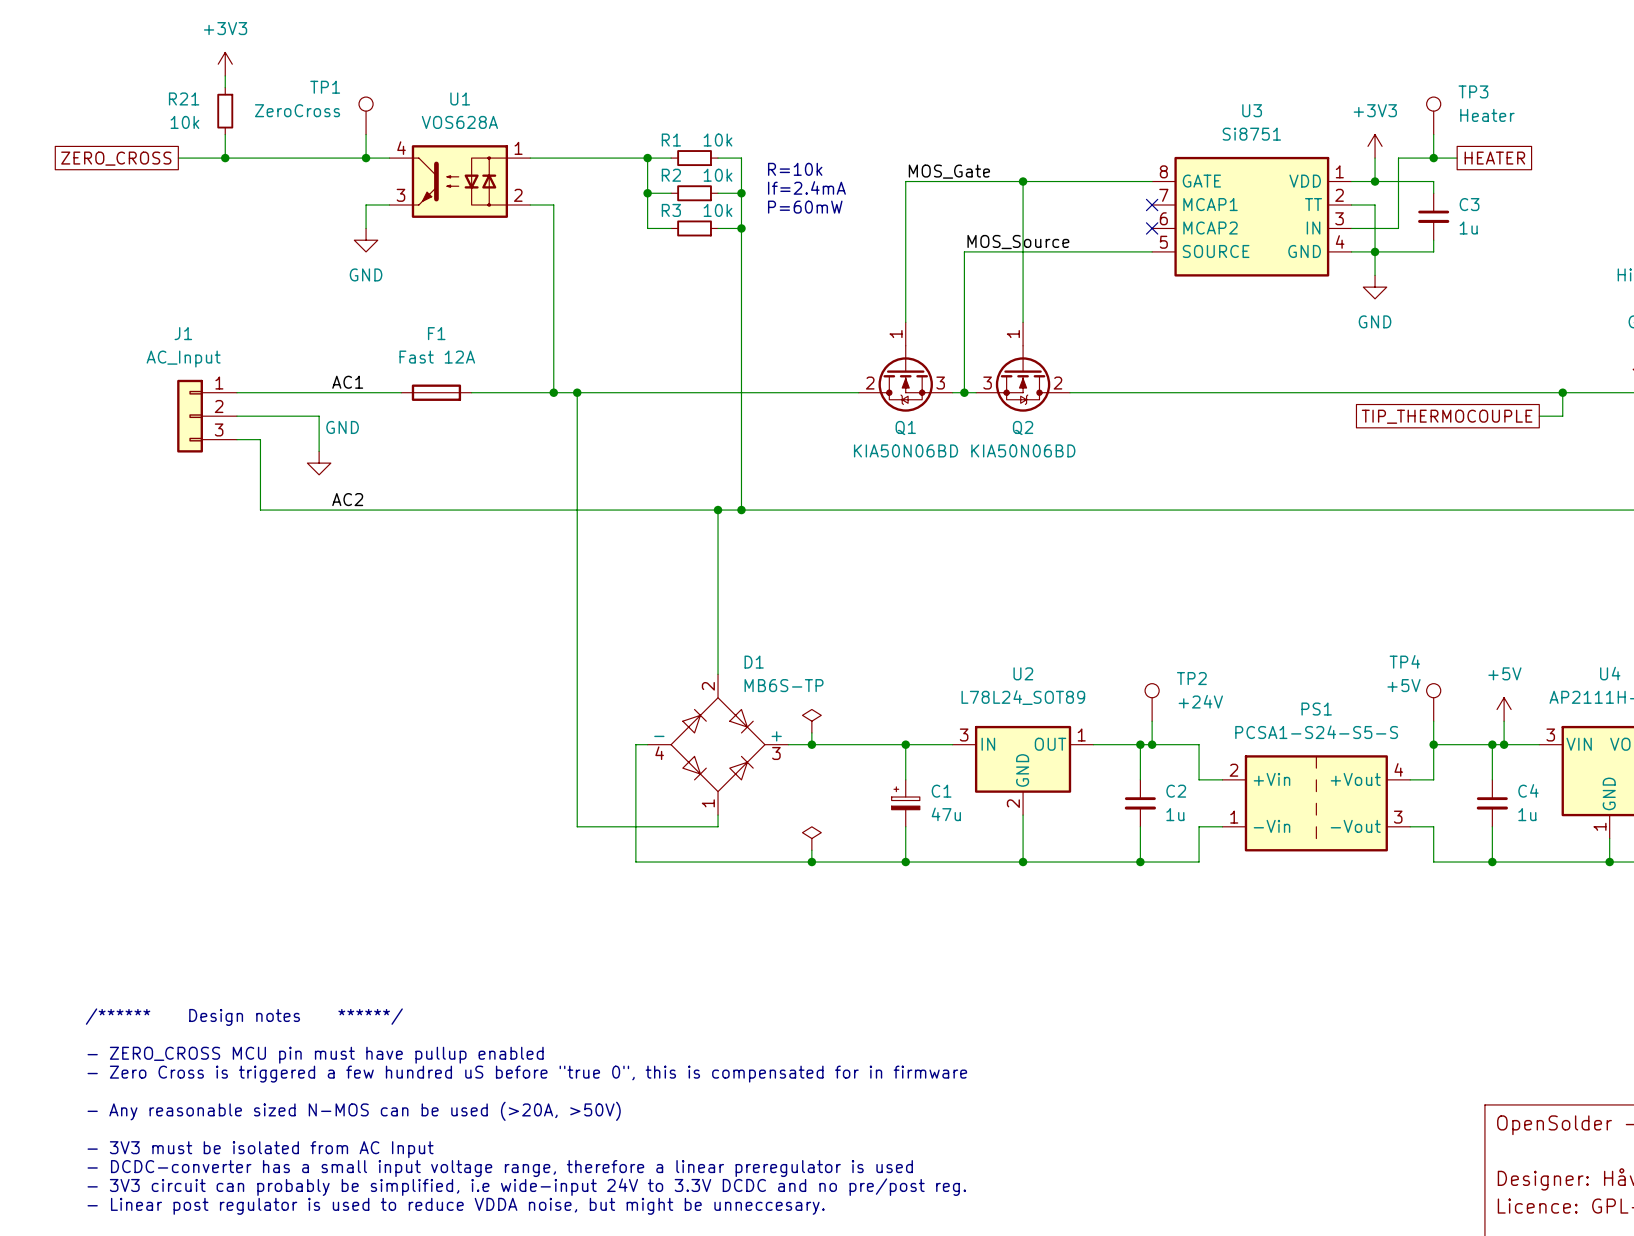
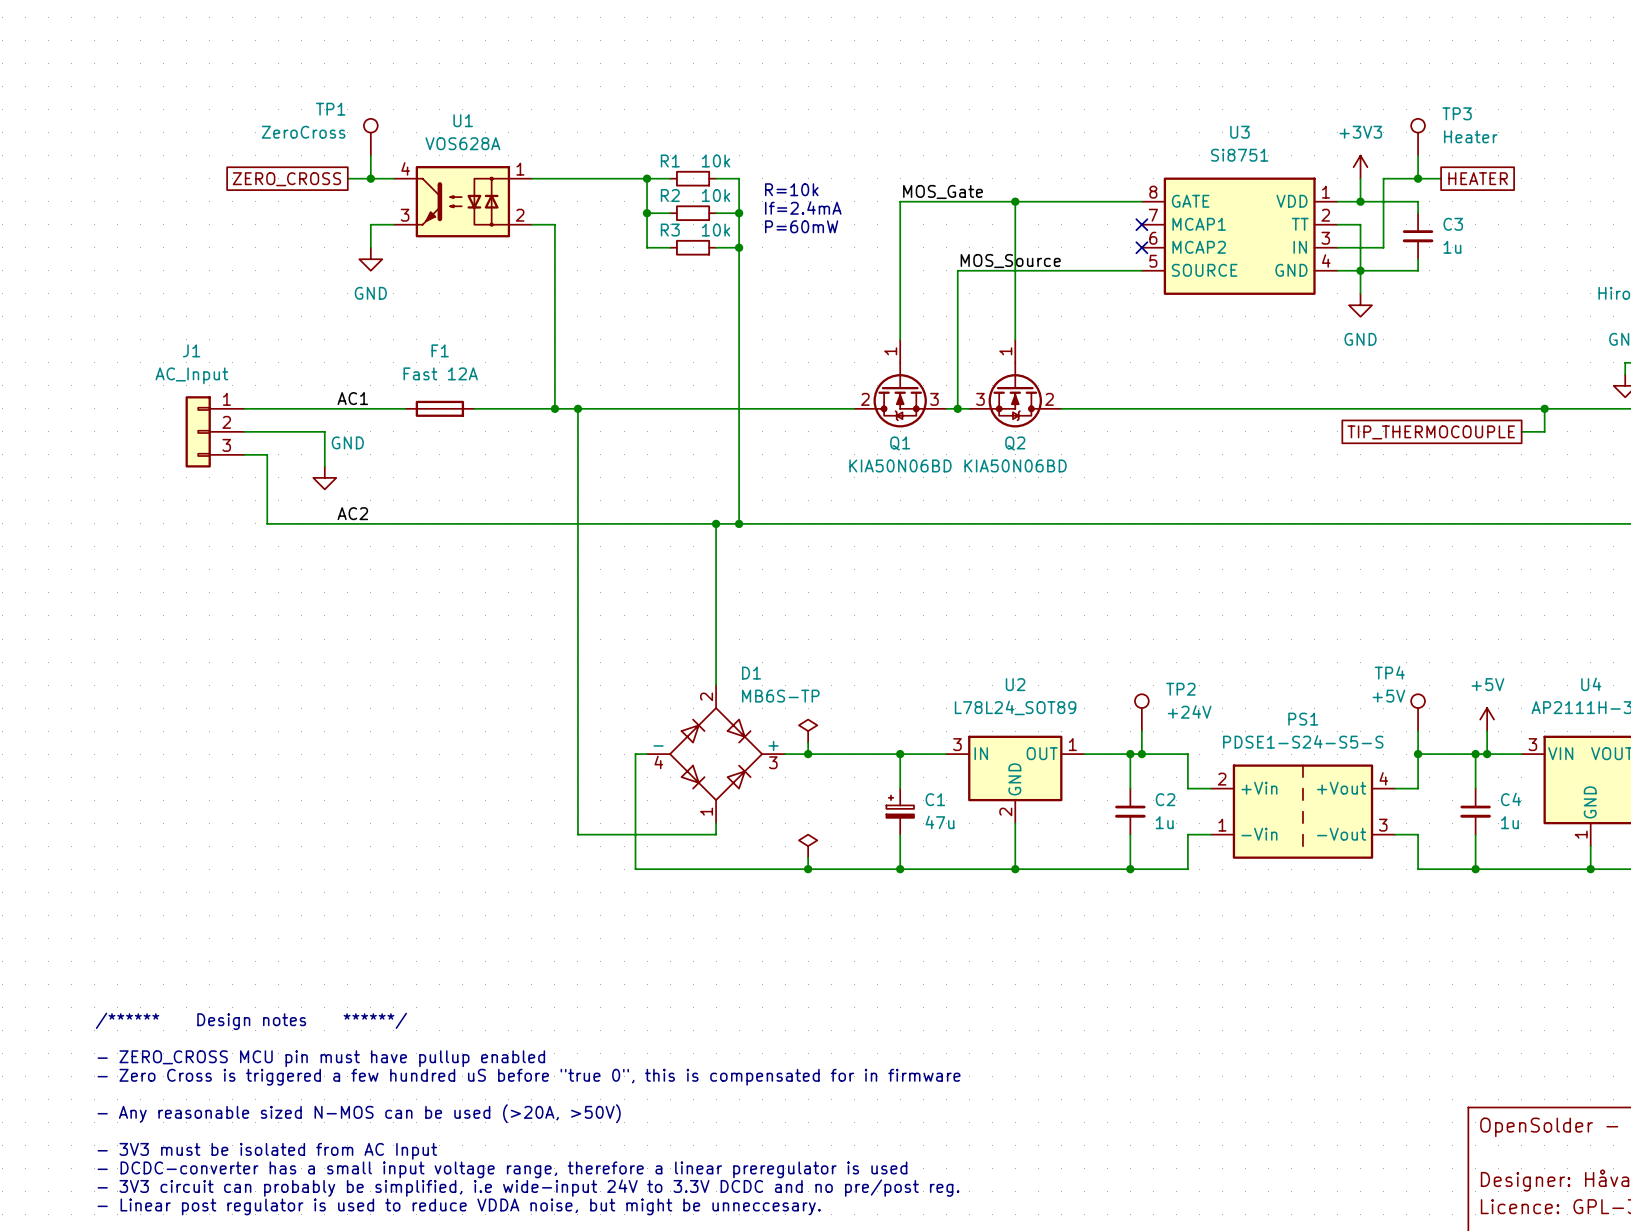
power symbol: +3V3 (225, 64) -> none
wire: (225, 75) (225, 87) -> none
R21: 10k (225, 111) -> none
wire: (225, 134) (225, 158) -> none
global label position: ZERO_CROSS (116, 158) -> ZERO_CROSS (286, 179)
wire: (178, 158) (342, 158) -> none
junction: (225, 158) -> none
PS1 value: PCSA1-S24-S5-S (1316, 732) -> PDSE1-S24-S5-S (1303, 741)

